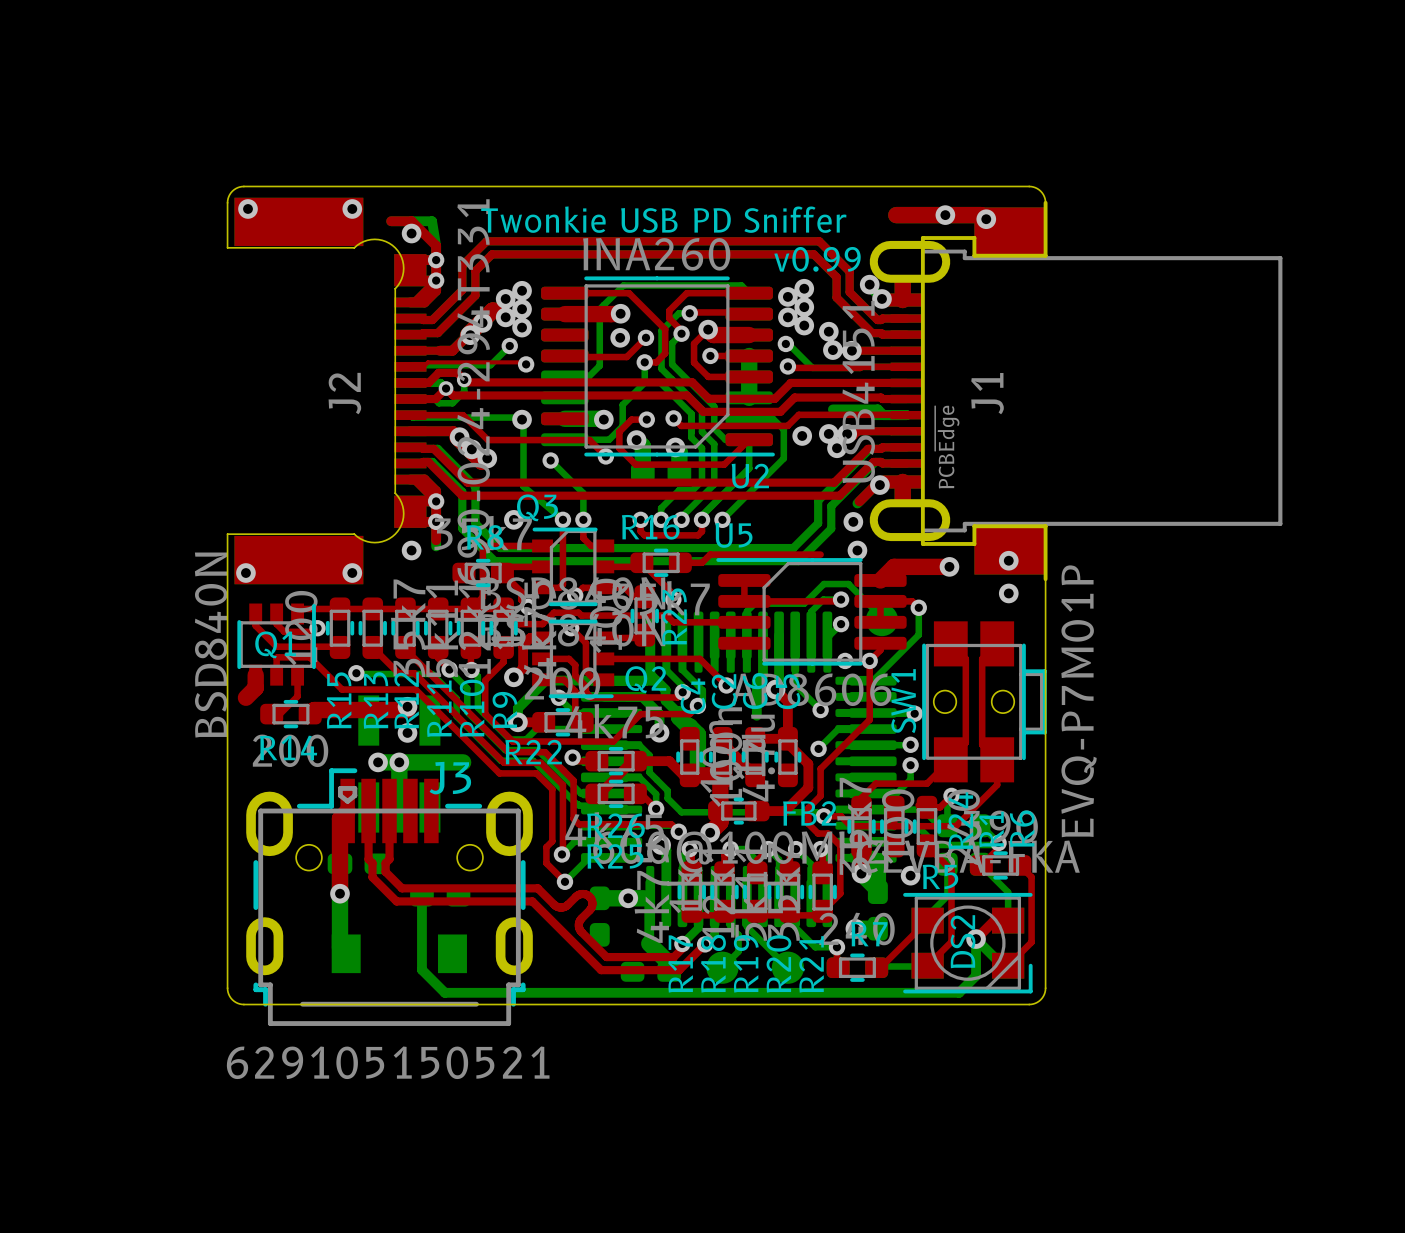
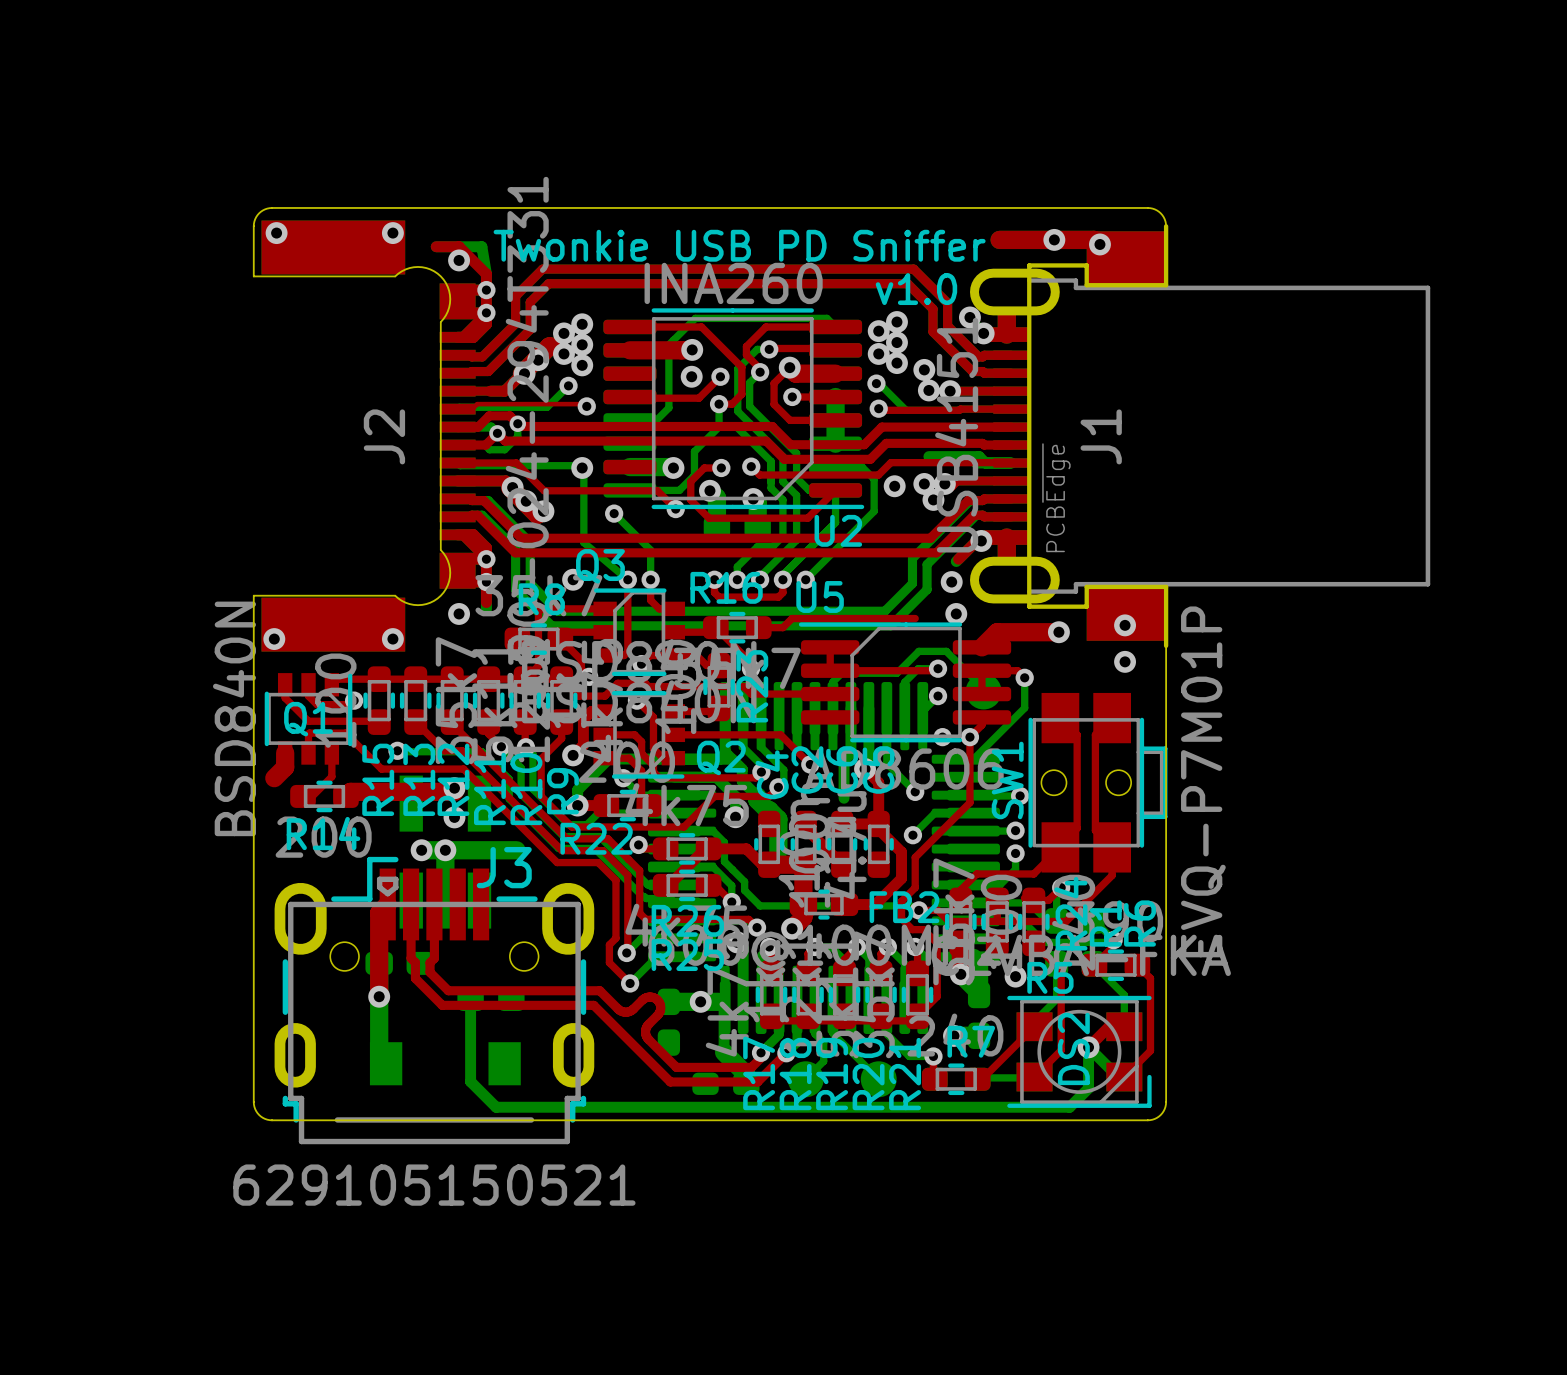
text: v0.99 (817, 259) -> v1.0 (916, 289)

